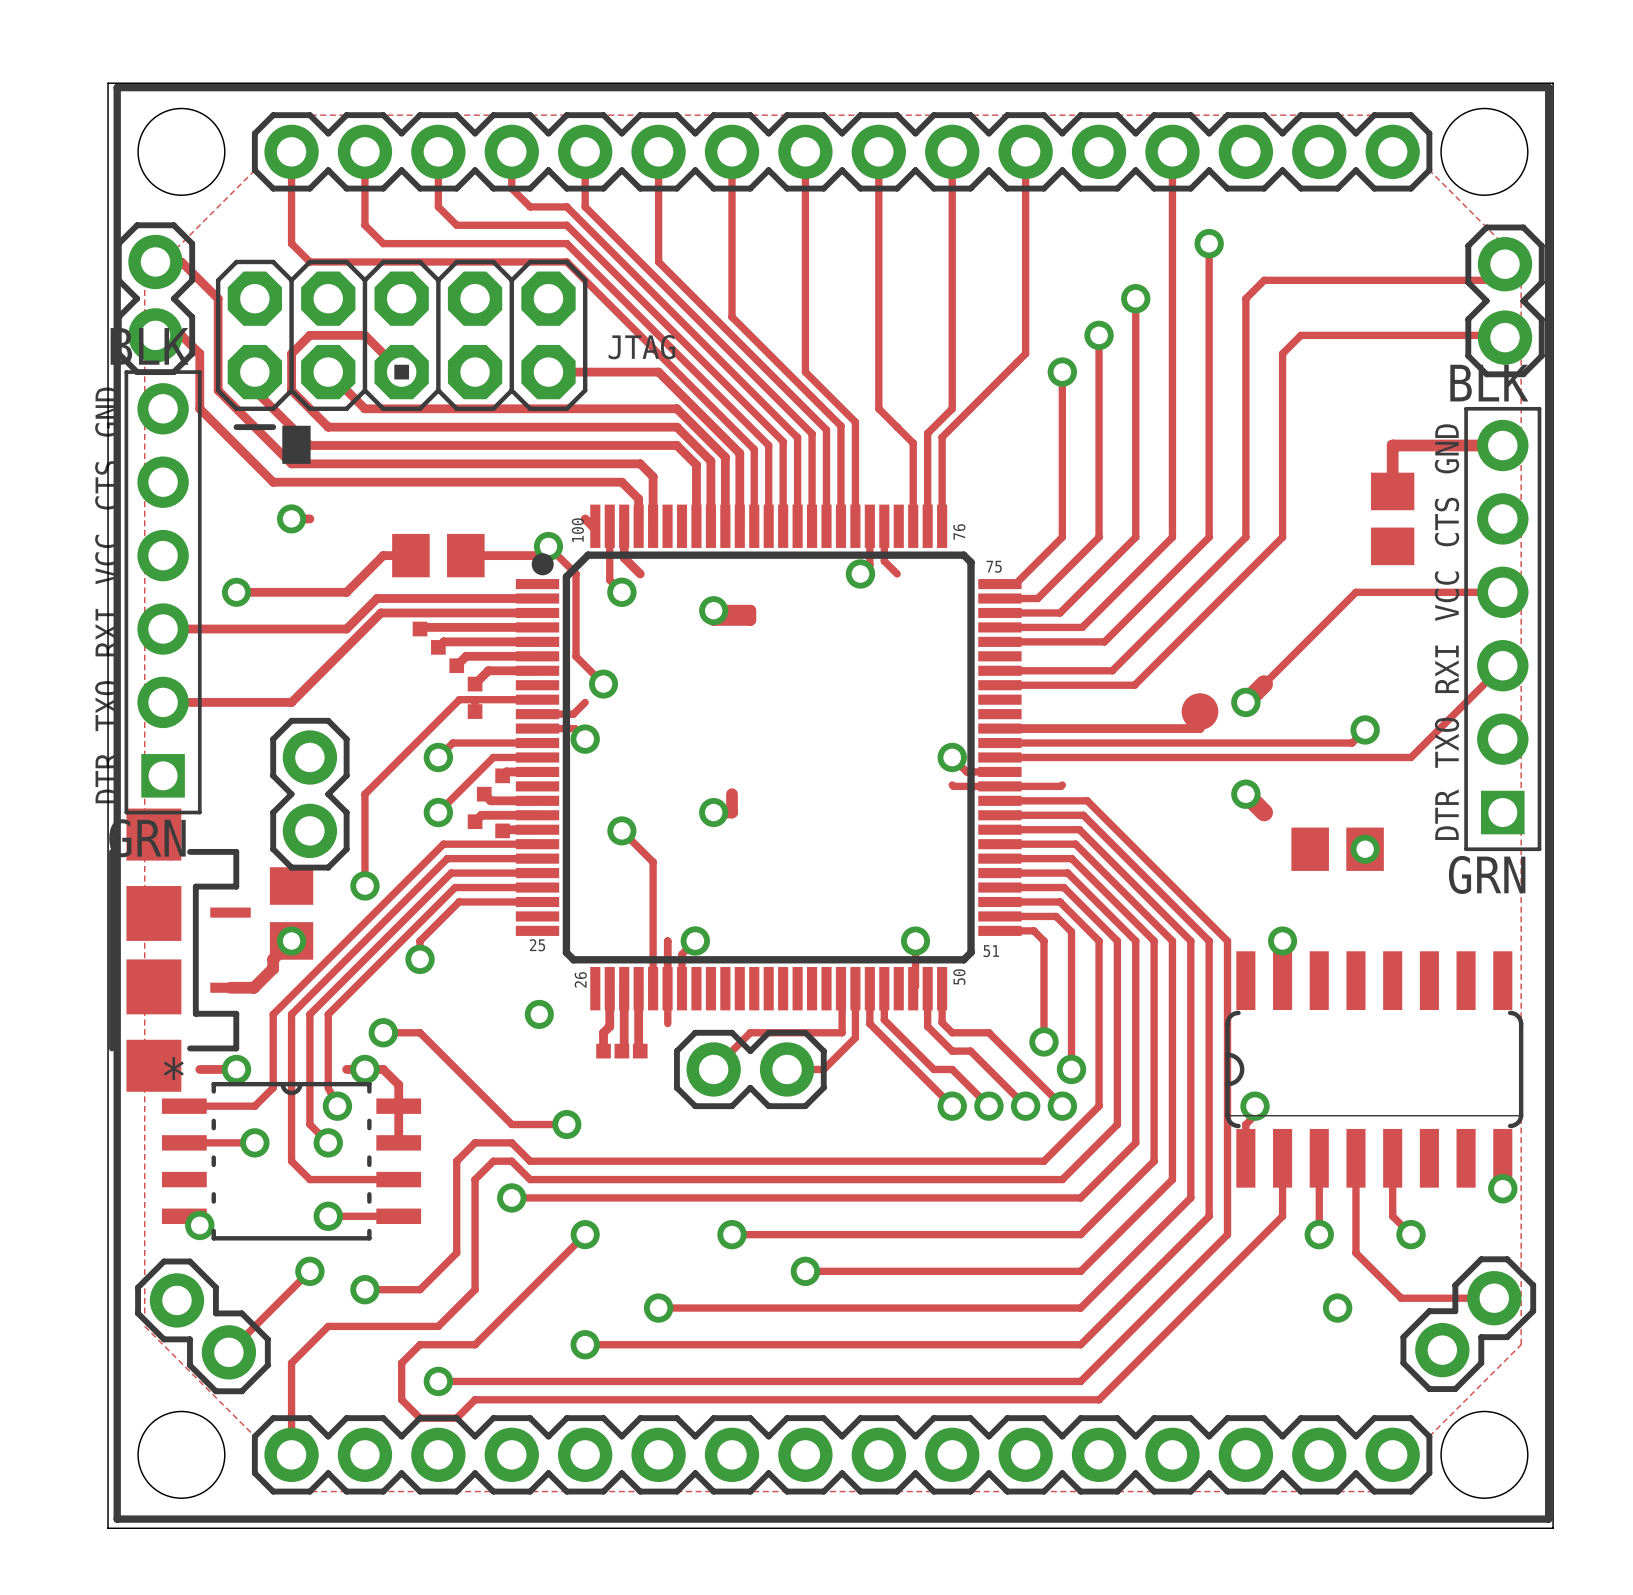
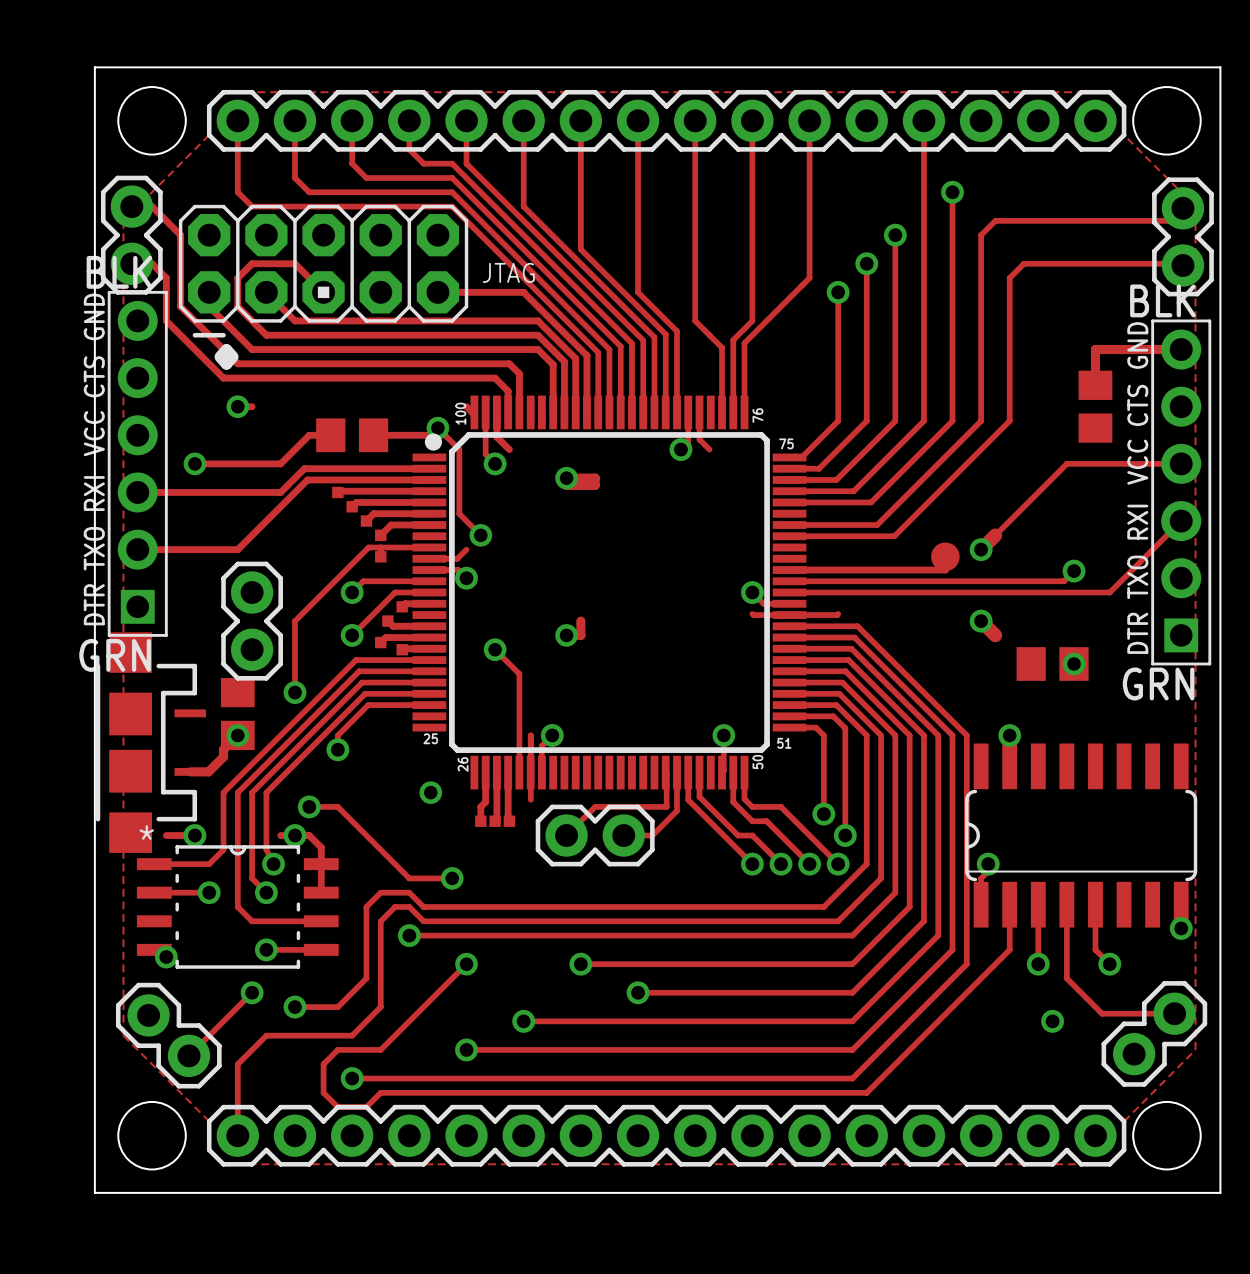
line: (117, 87) (1548, 87) (1548, 1519) (117, 1519) (117, 87) -> none

